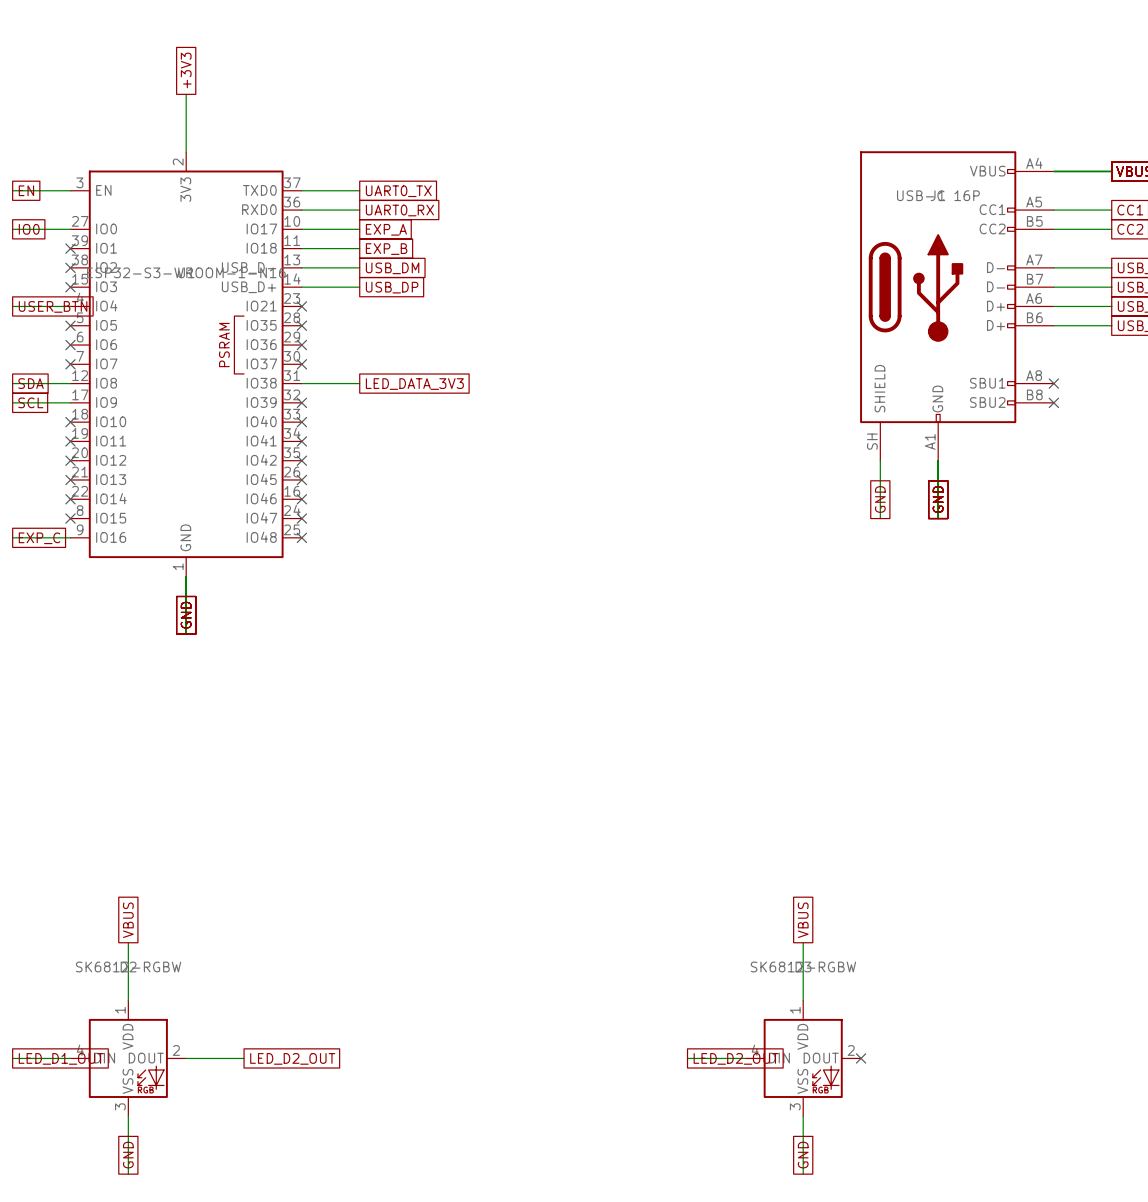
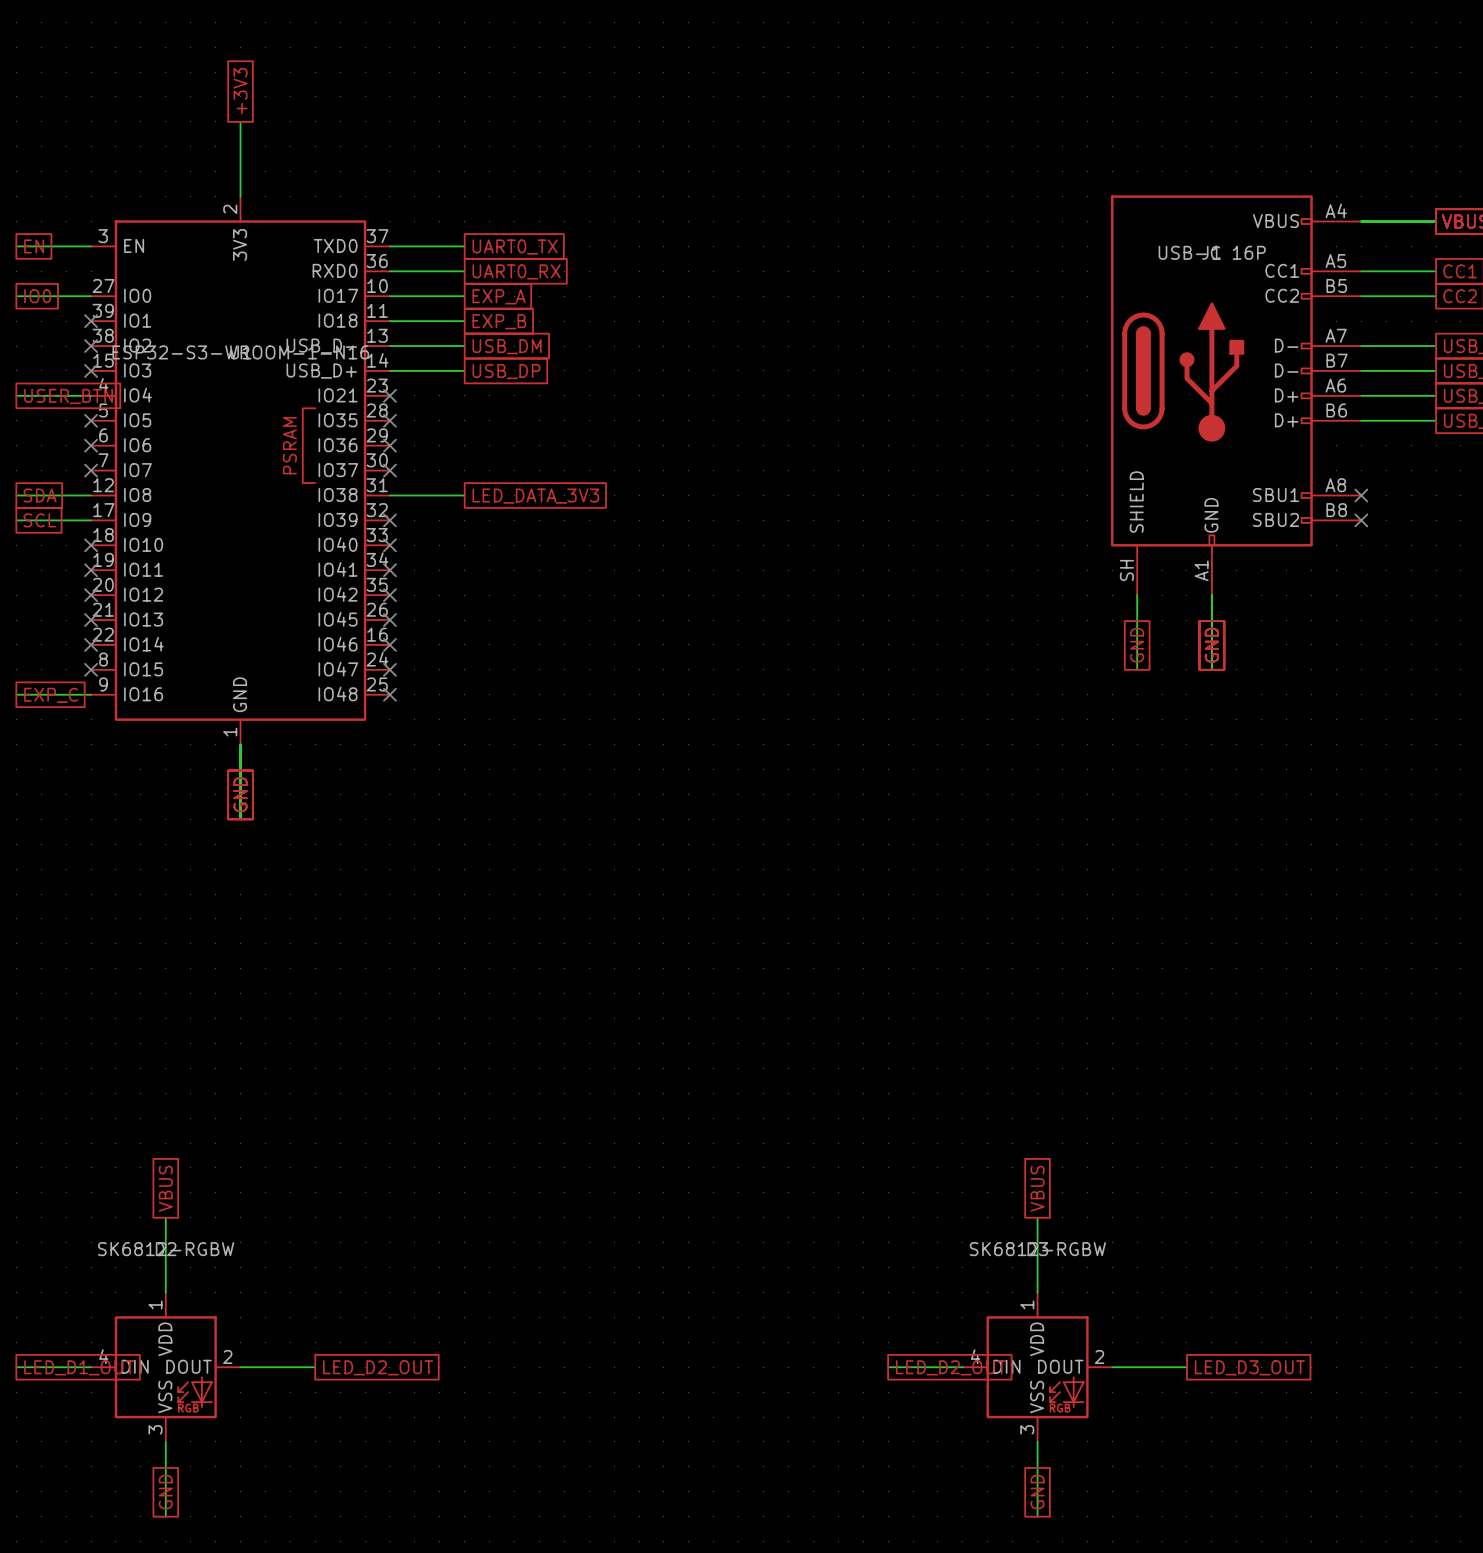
wire: none -> (1112, 1367) (1186, 1367)
no-connect mark: (861, 1058) -> none
global label: none -> LED_D3_OUT (1249, 1367)

